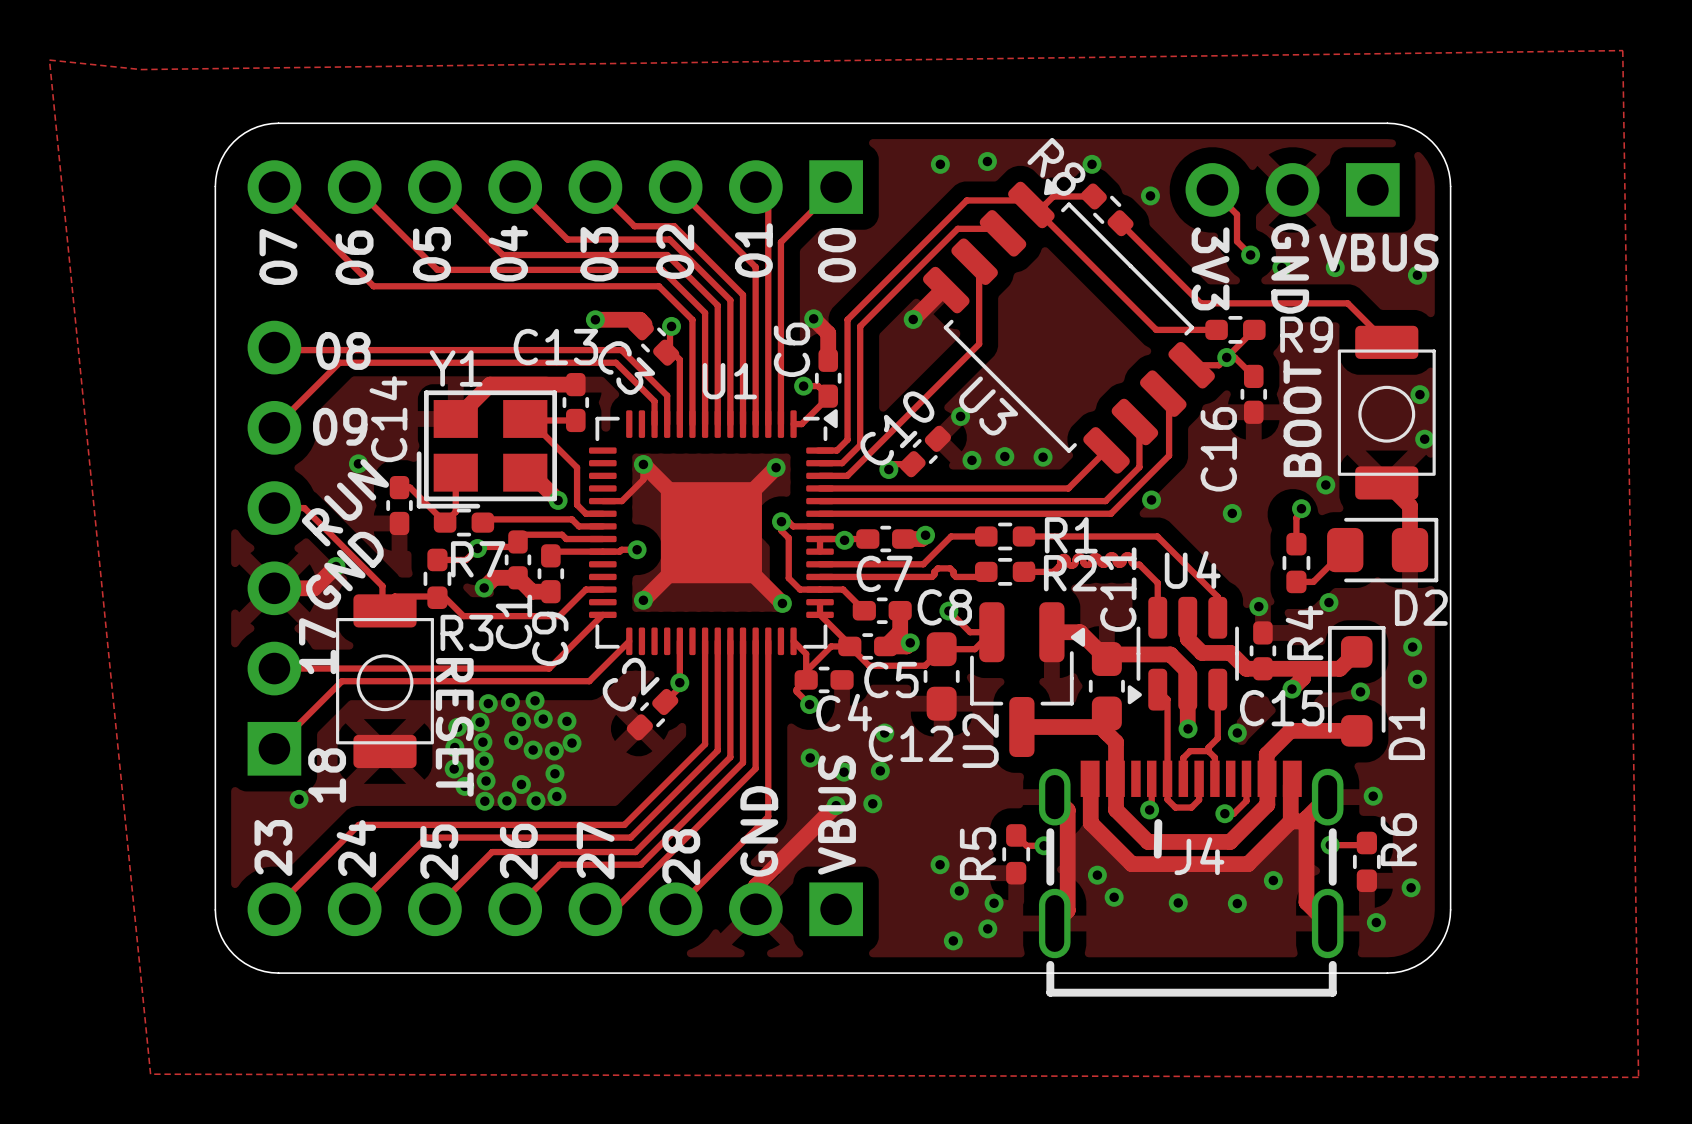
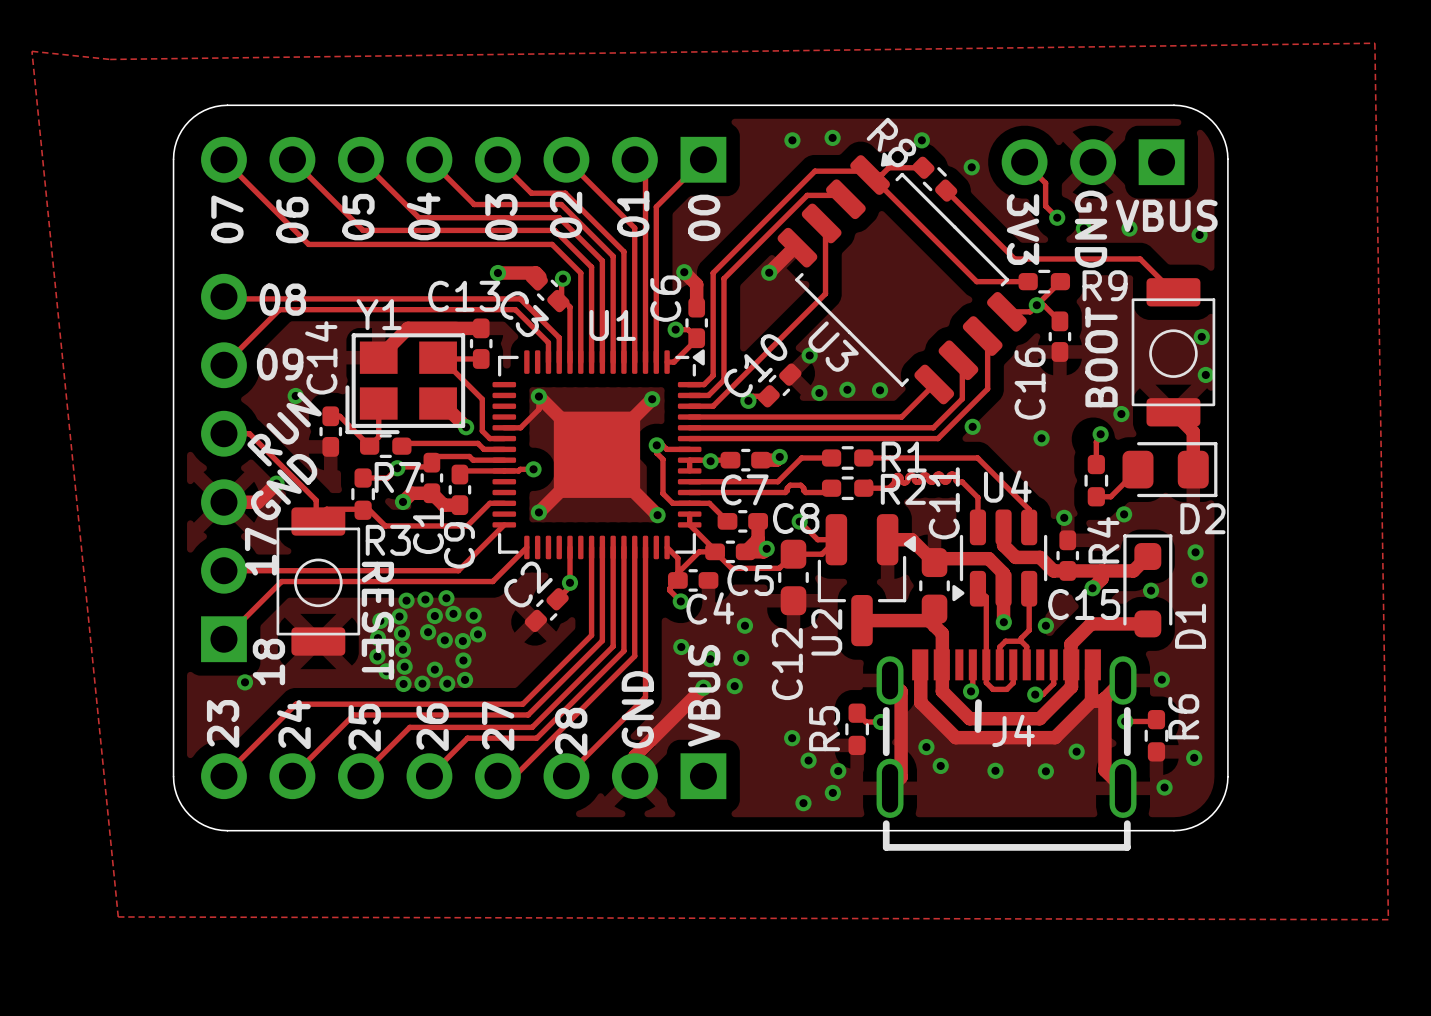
C12 name rotation: 0° (911, 743) -> 90° counterclockwise (787, 664)

